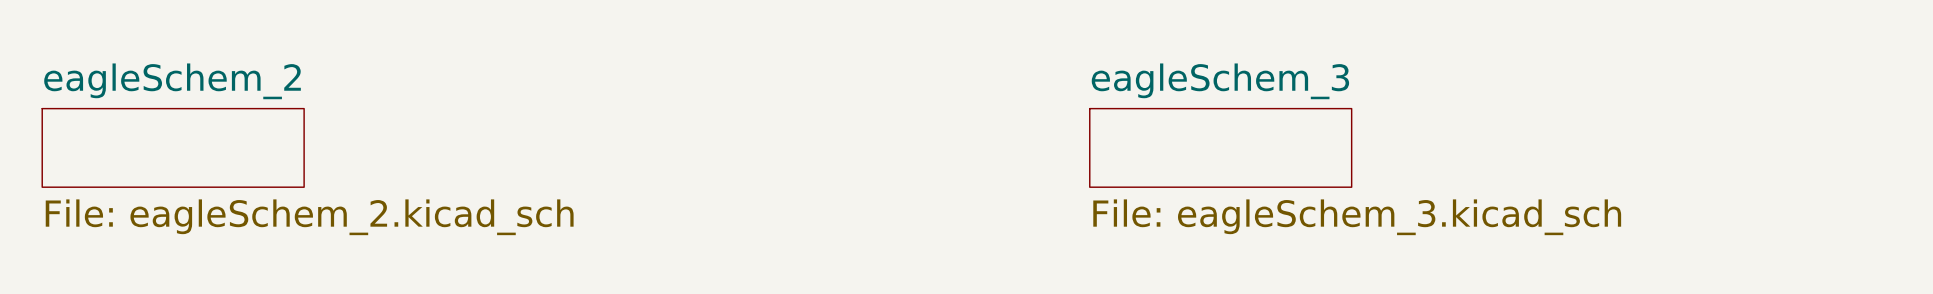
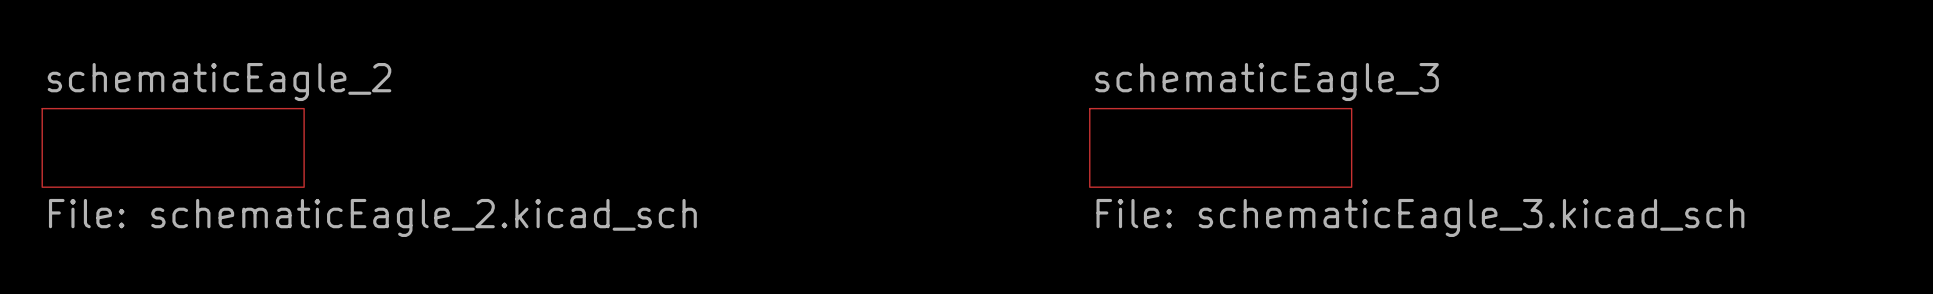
sheet eagleSchem_2 name: eagleSchem_2 (172, 81) -> schematicEagle_2 (219, 82)
sheet eagleSchem_3 name: eagleSchem_3 (1220, 81) -> schematicEagle_3 (1267, 82)
sheet eagleSchem_2 value: File: eagleSchem_2.kicad_sch (309, 217) -> File: schematicEagle_2.kicad_sch (372, 217)
sheet eagleSchem_3 value: File: eagleSchem_3.kicad_sch (1357, 217) -> File: schematicEagle_3.kicad_sch (1420, 217)

